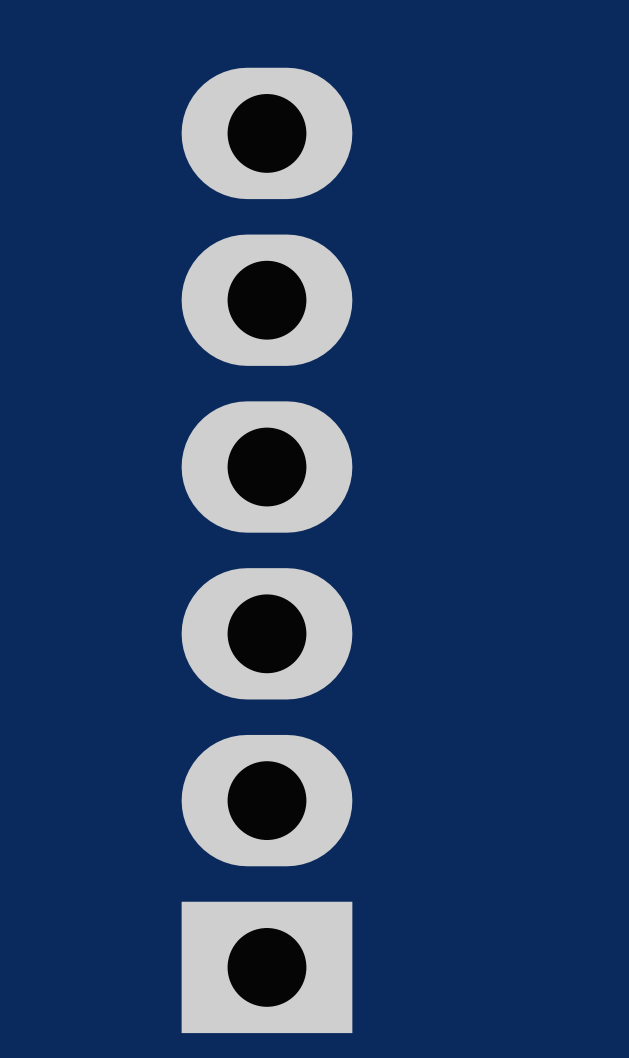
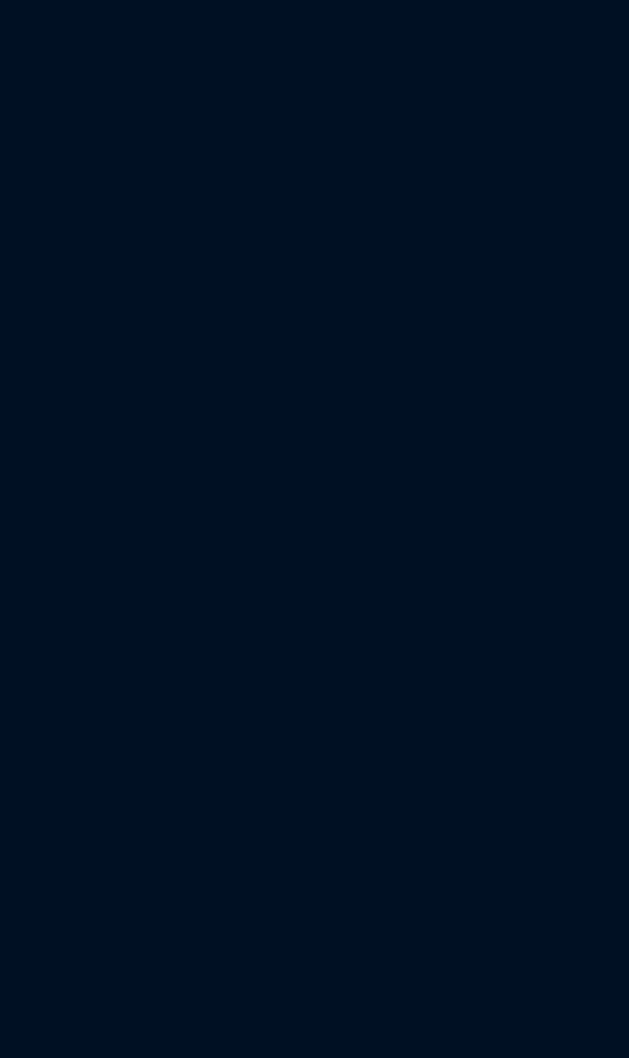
part: (266, 550) -> none

